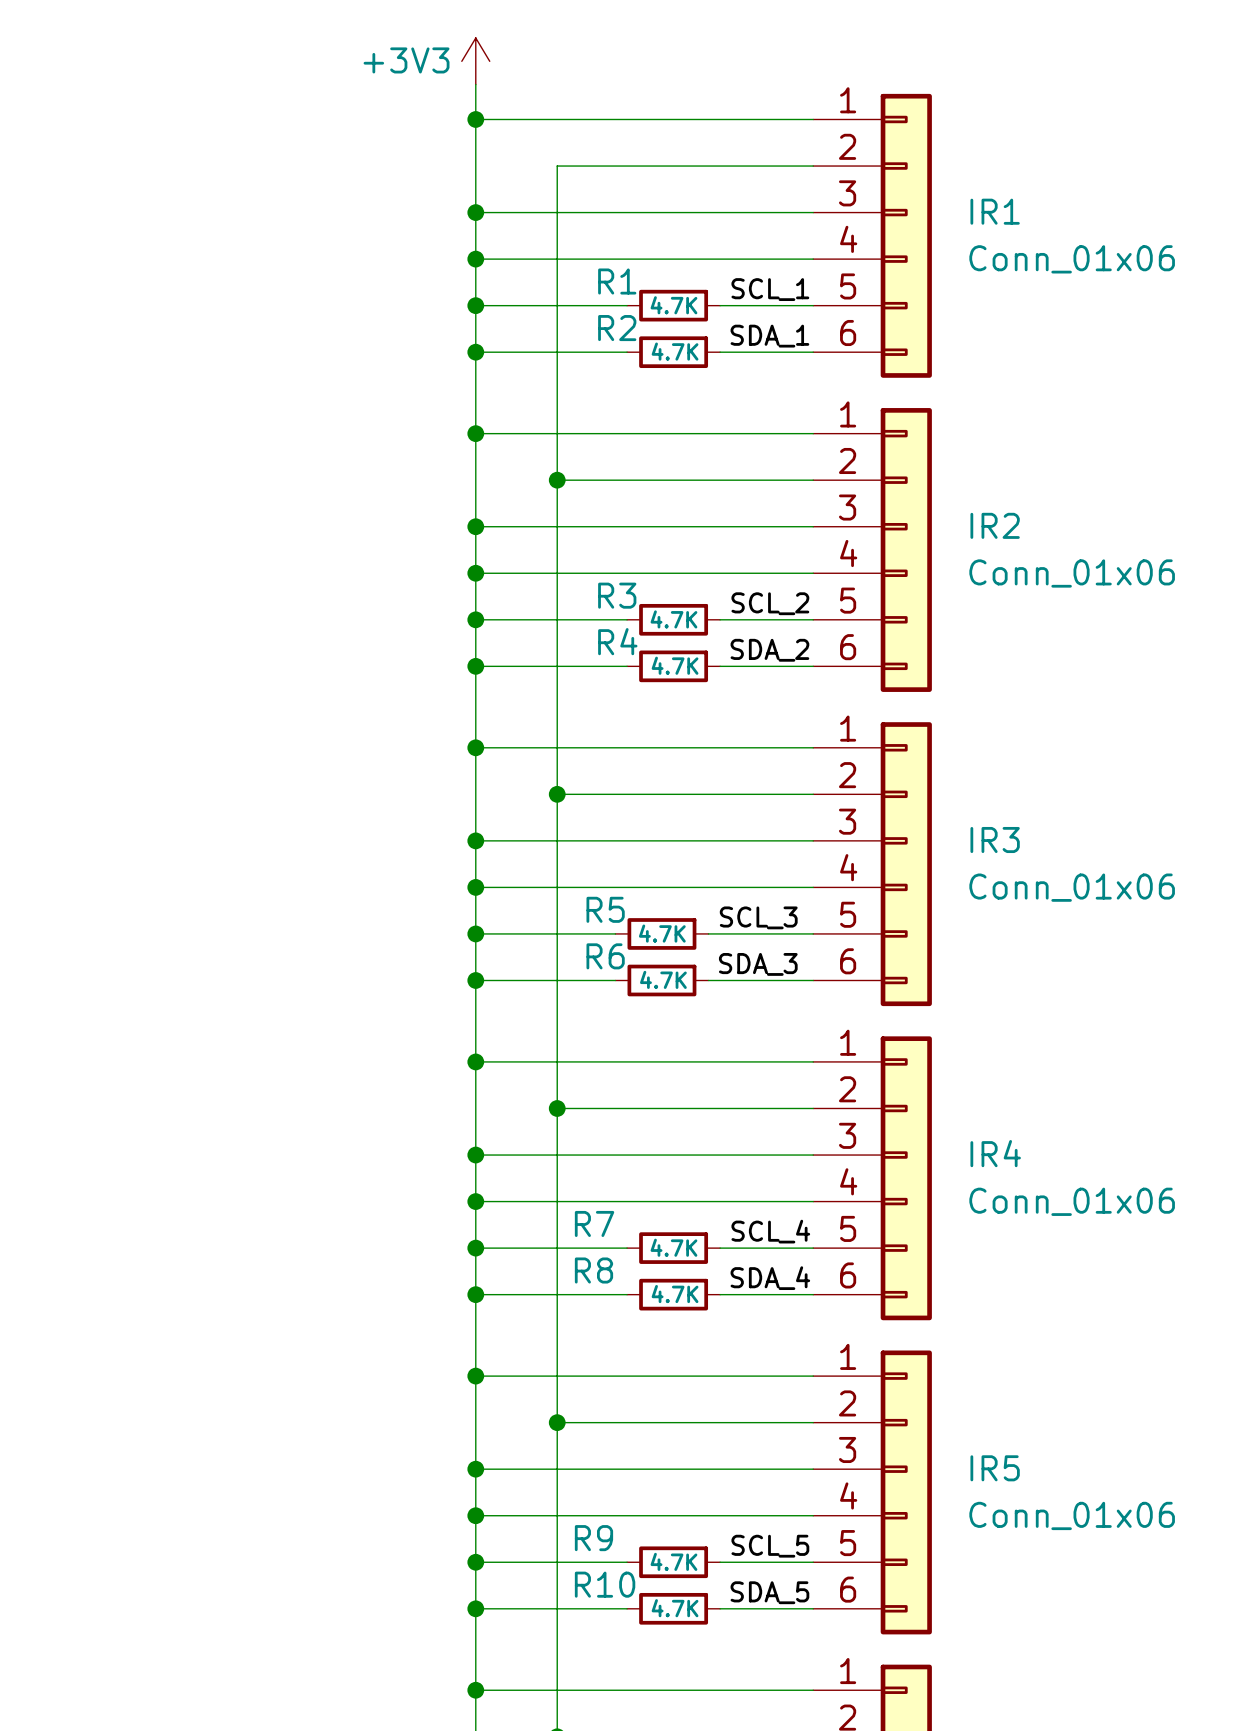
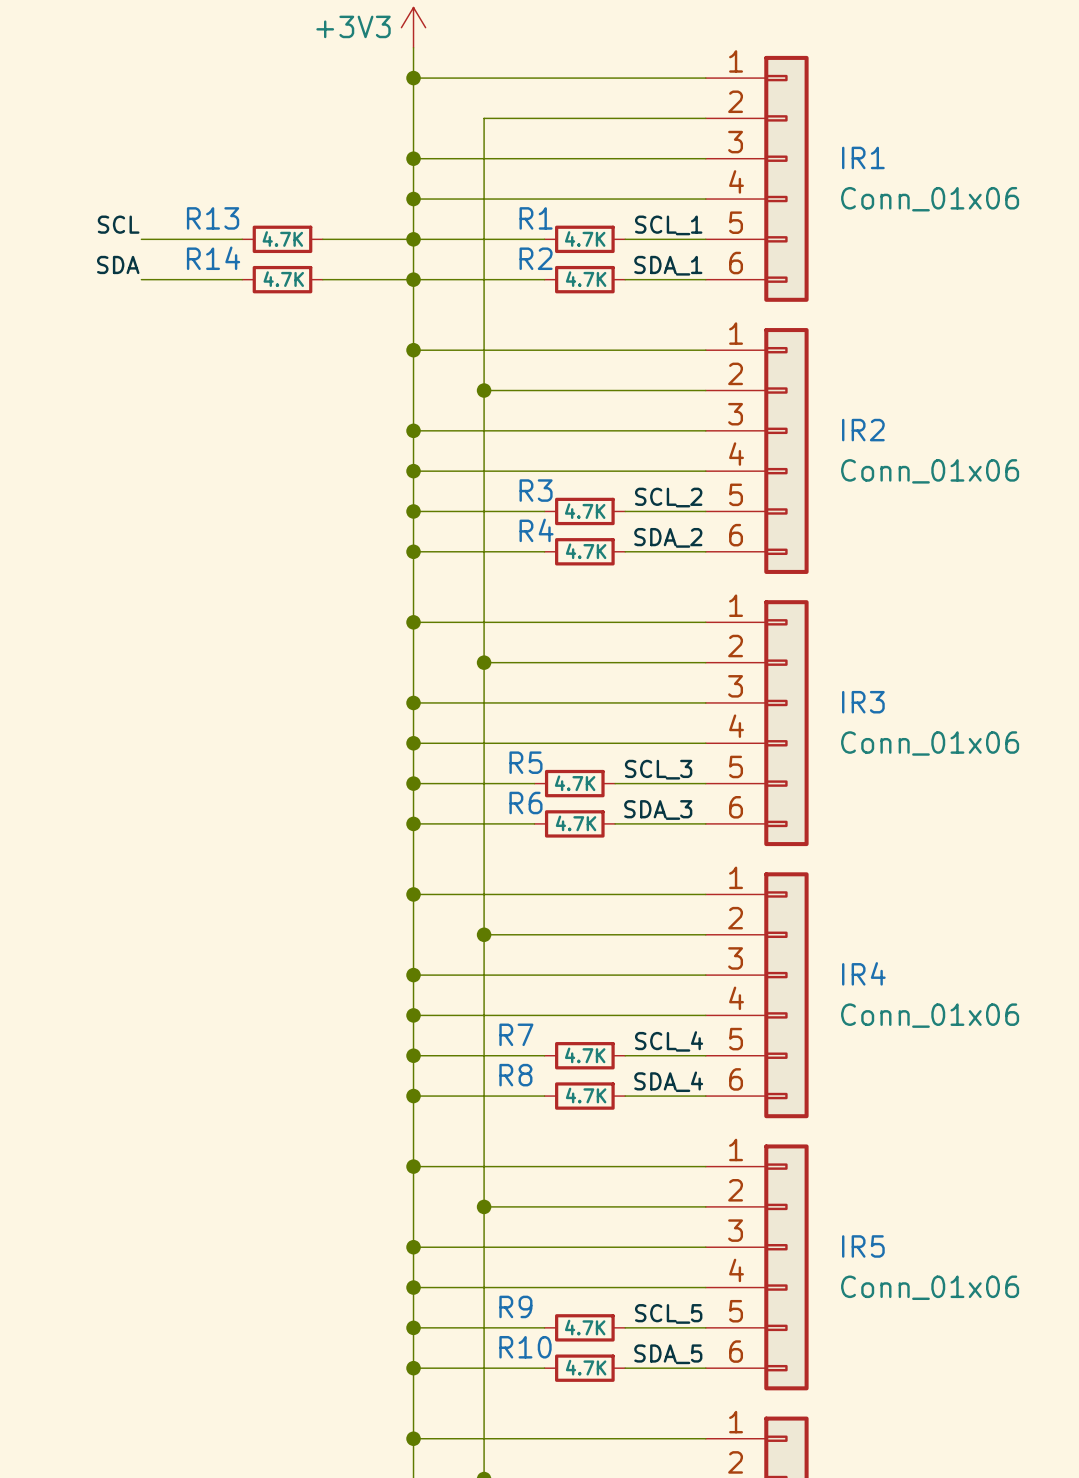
label: none -> SCL (118, 224)
wire: none -> (141, 239) (242, 239)
R13: none -> 4.7K (282, 239)
wire: none -> (322, 239) (413, 239)
label: none -> SDA (118, 264)
wire: none -> (141, 279) (242, 279)
R14: none -> 4.7K (282, 279)
wire: none -> (322, 279) (413, 279)

